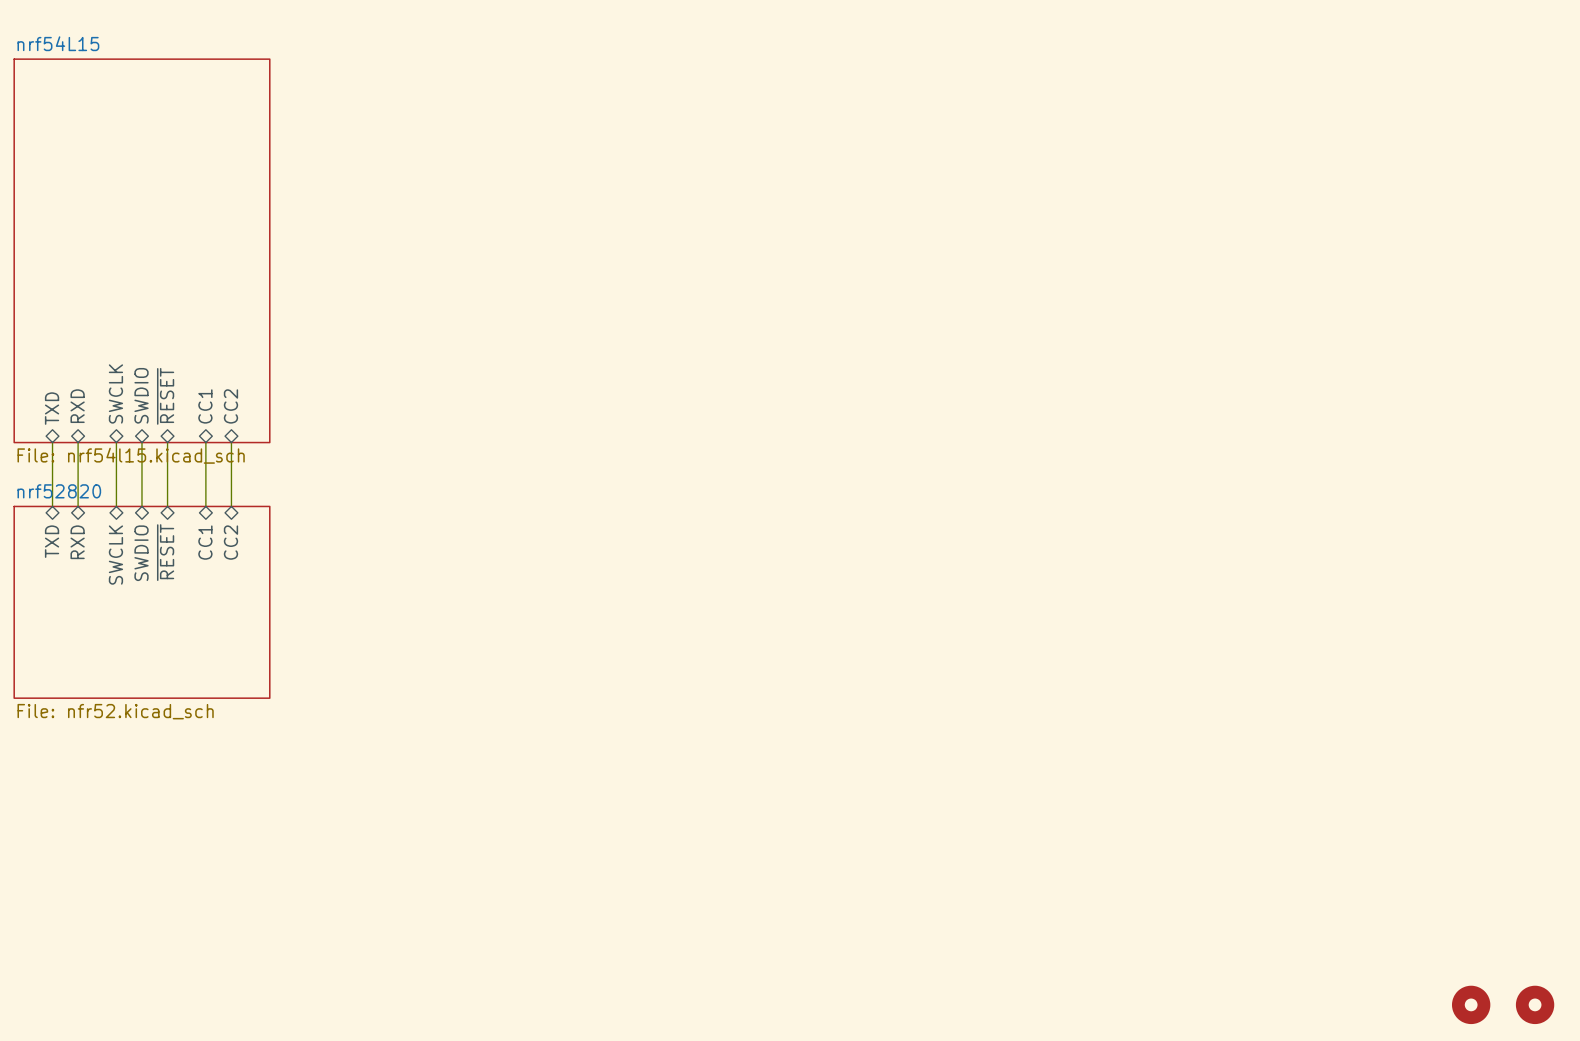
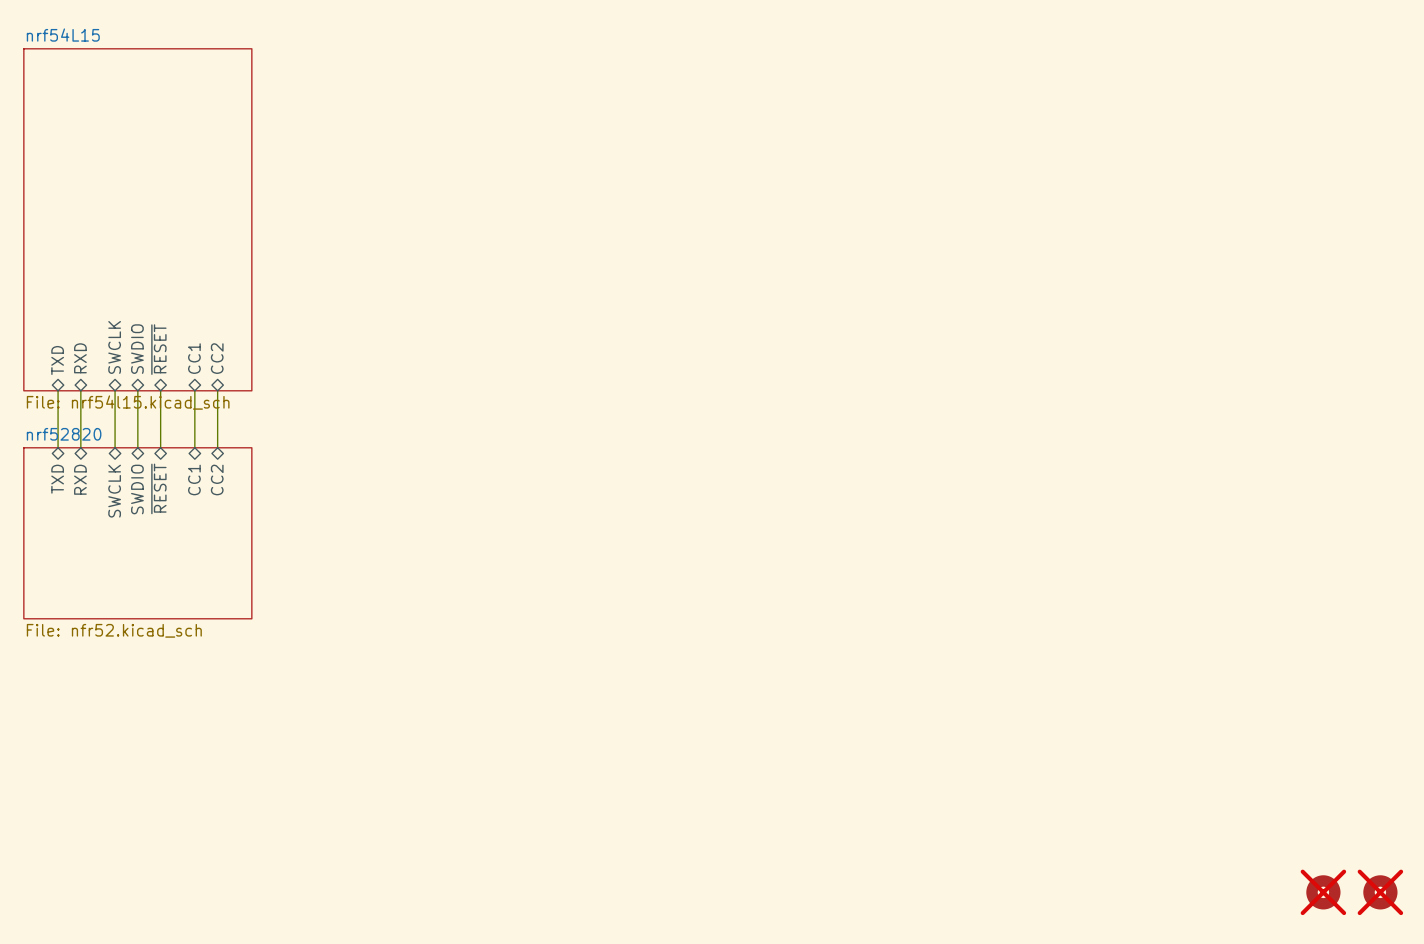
part do-not-place cross: none -> (1323, 892)
part do-not-place cross: none -> (1380, 892)

